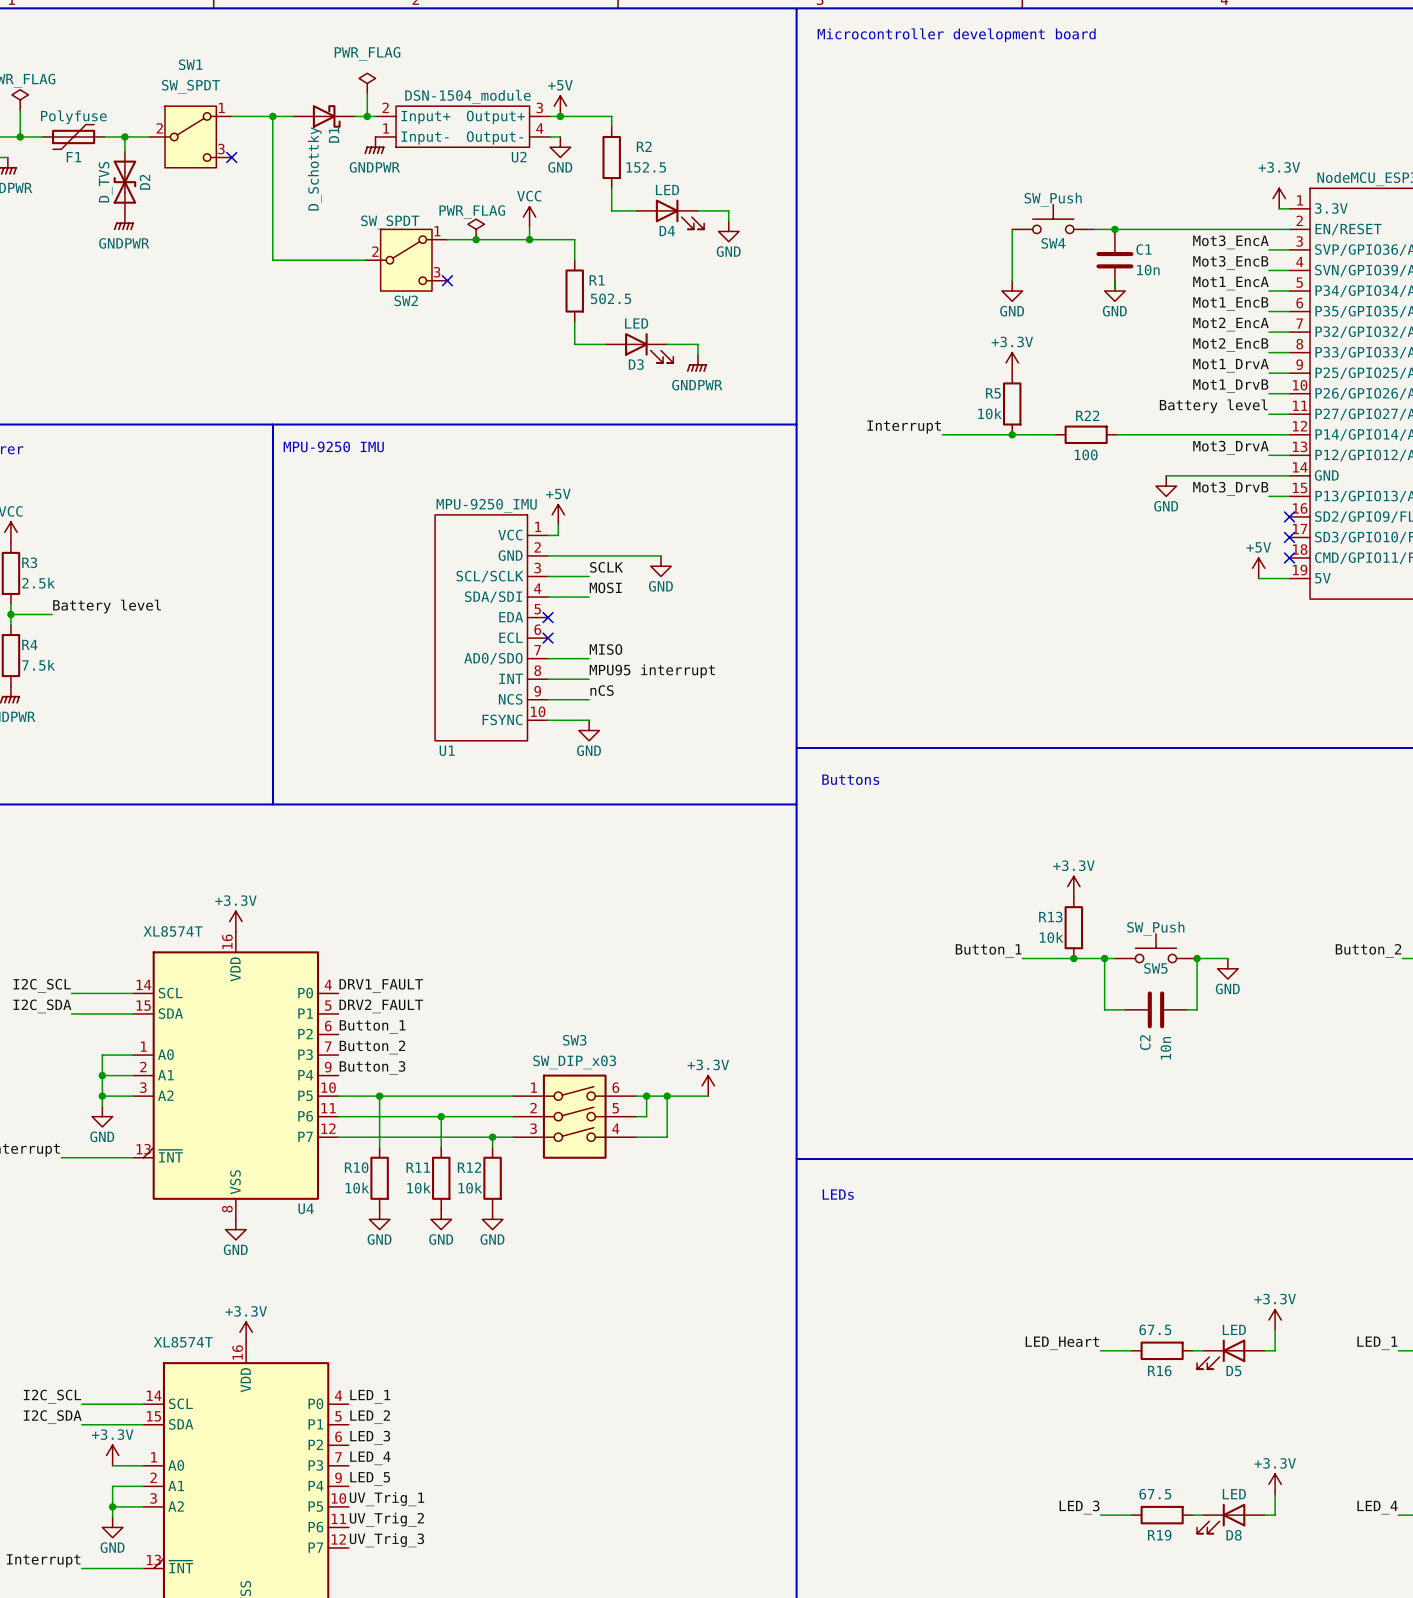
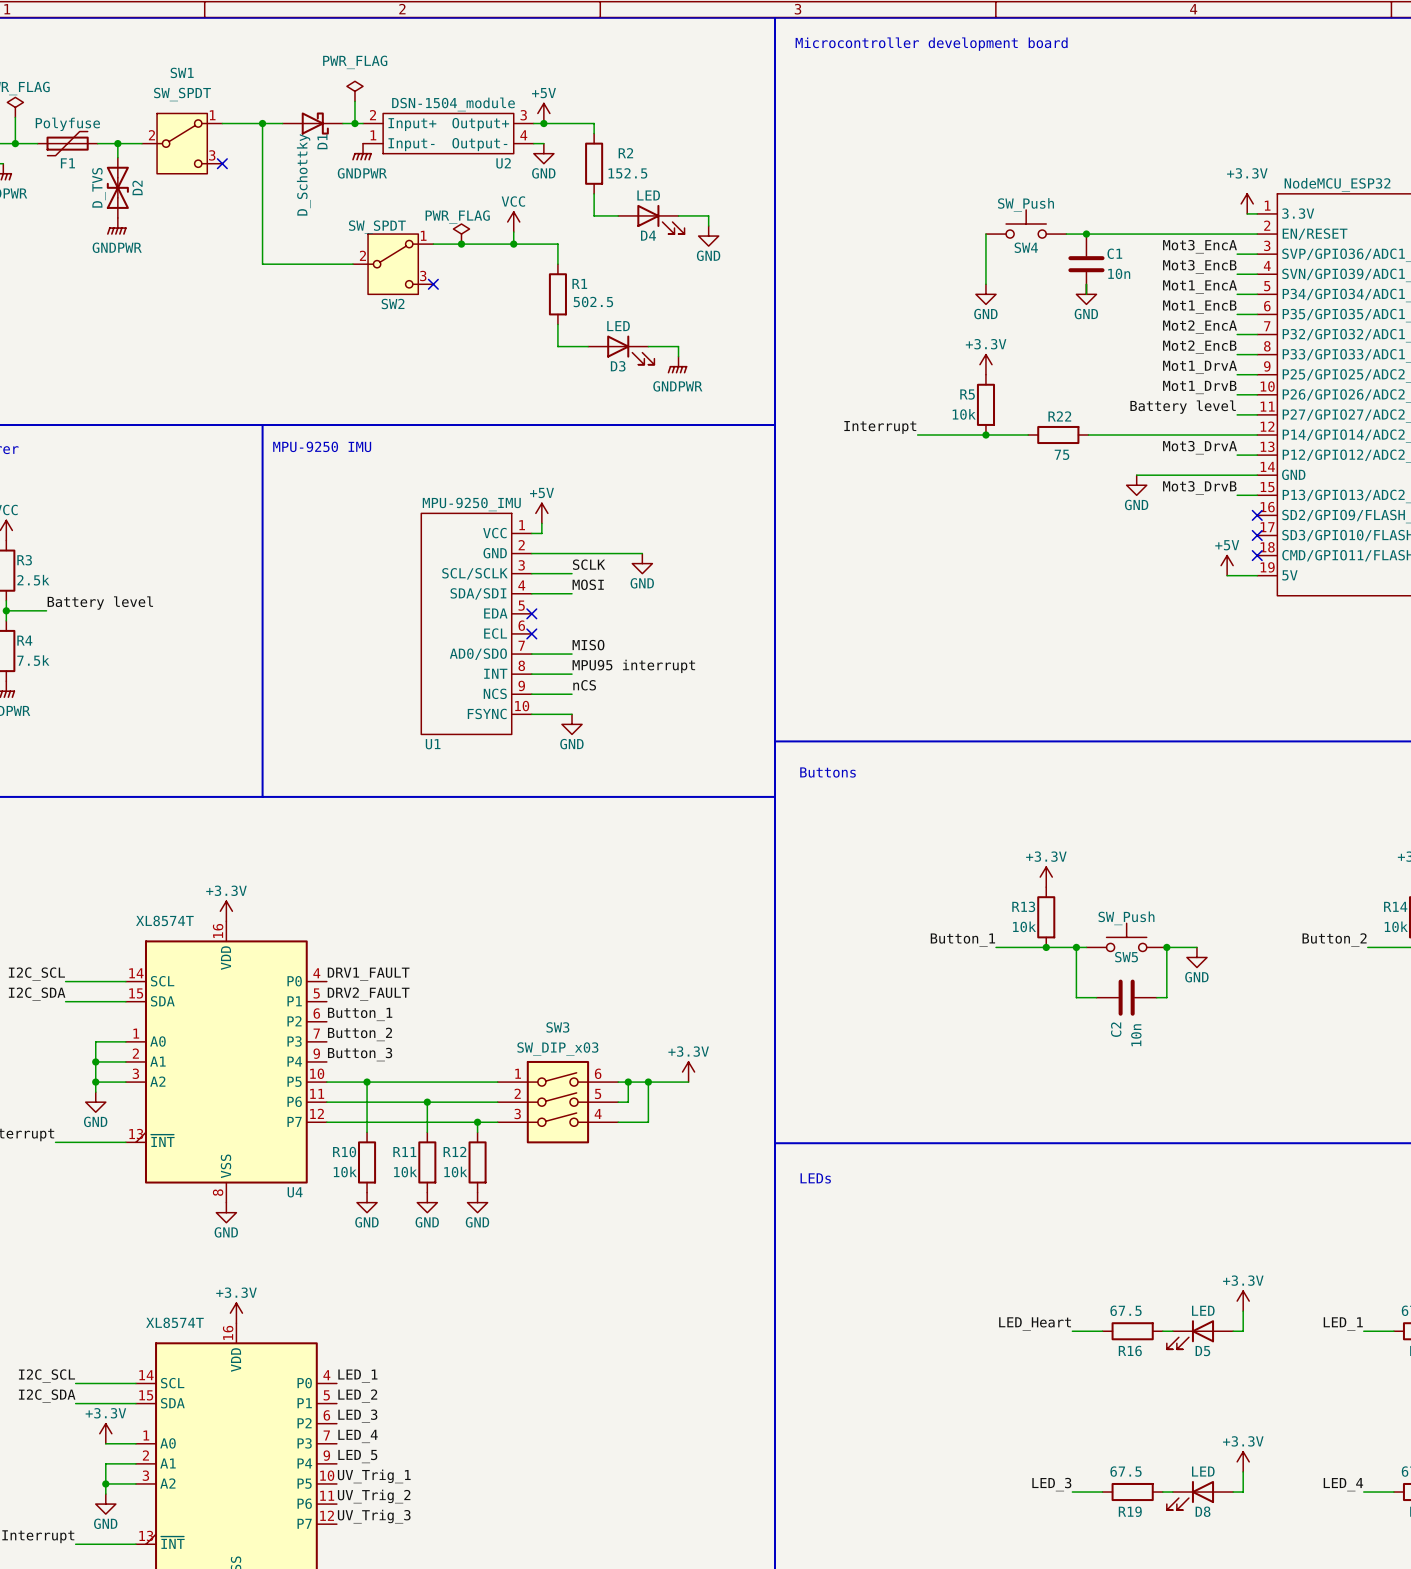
R22 value: 100 (1086, 454) -> 75 (1061, 454)

